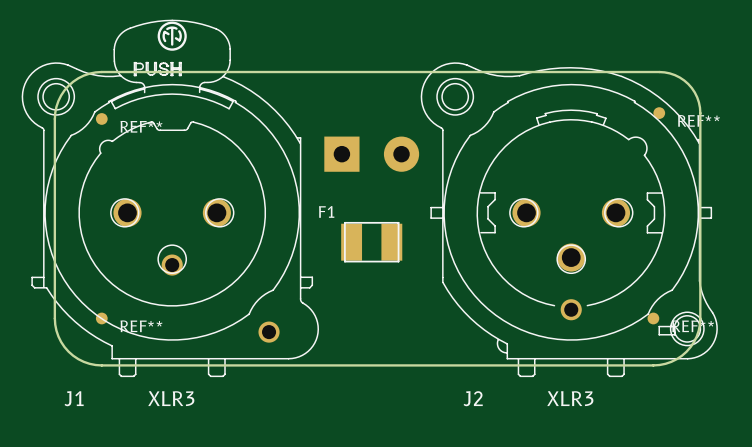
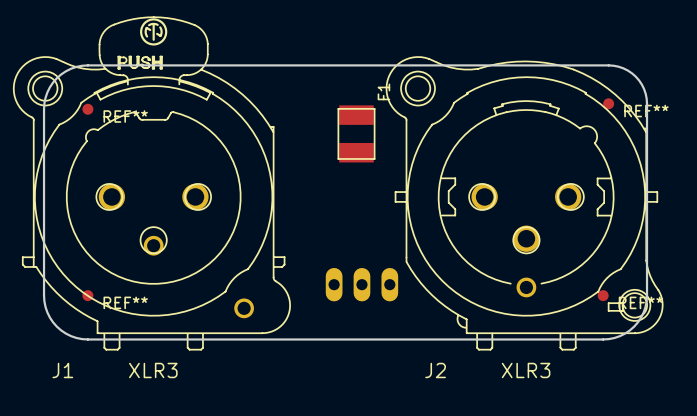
part: (371, 154) -> none
F1 rotation: 0° (371, 242) -> 90° clockwise (356, 133)
F1 position: (371, 242) -> (356, 133)
part: none -> (361, 284)

